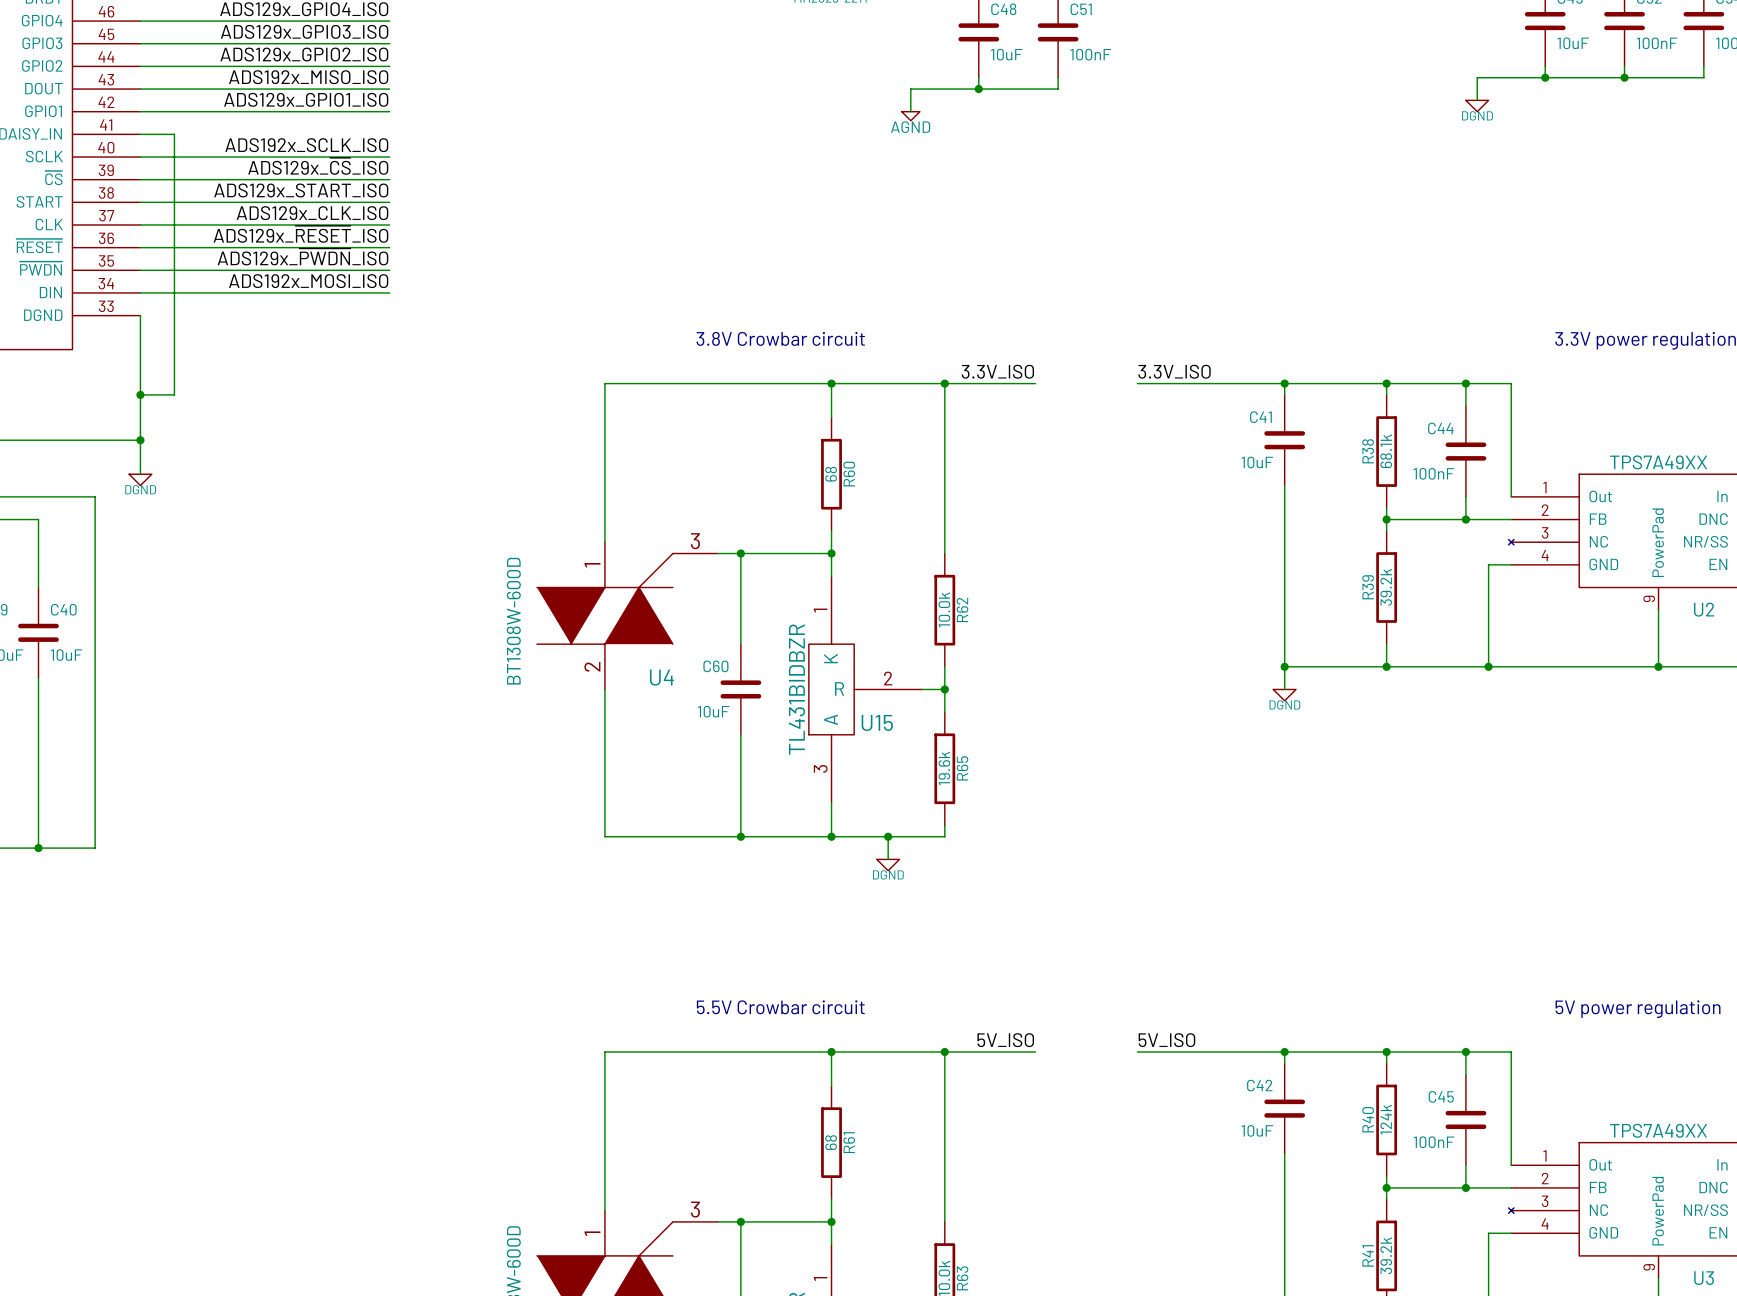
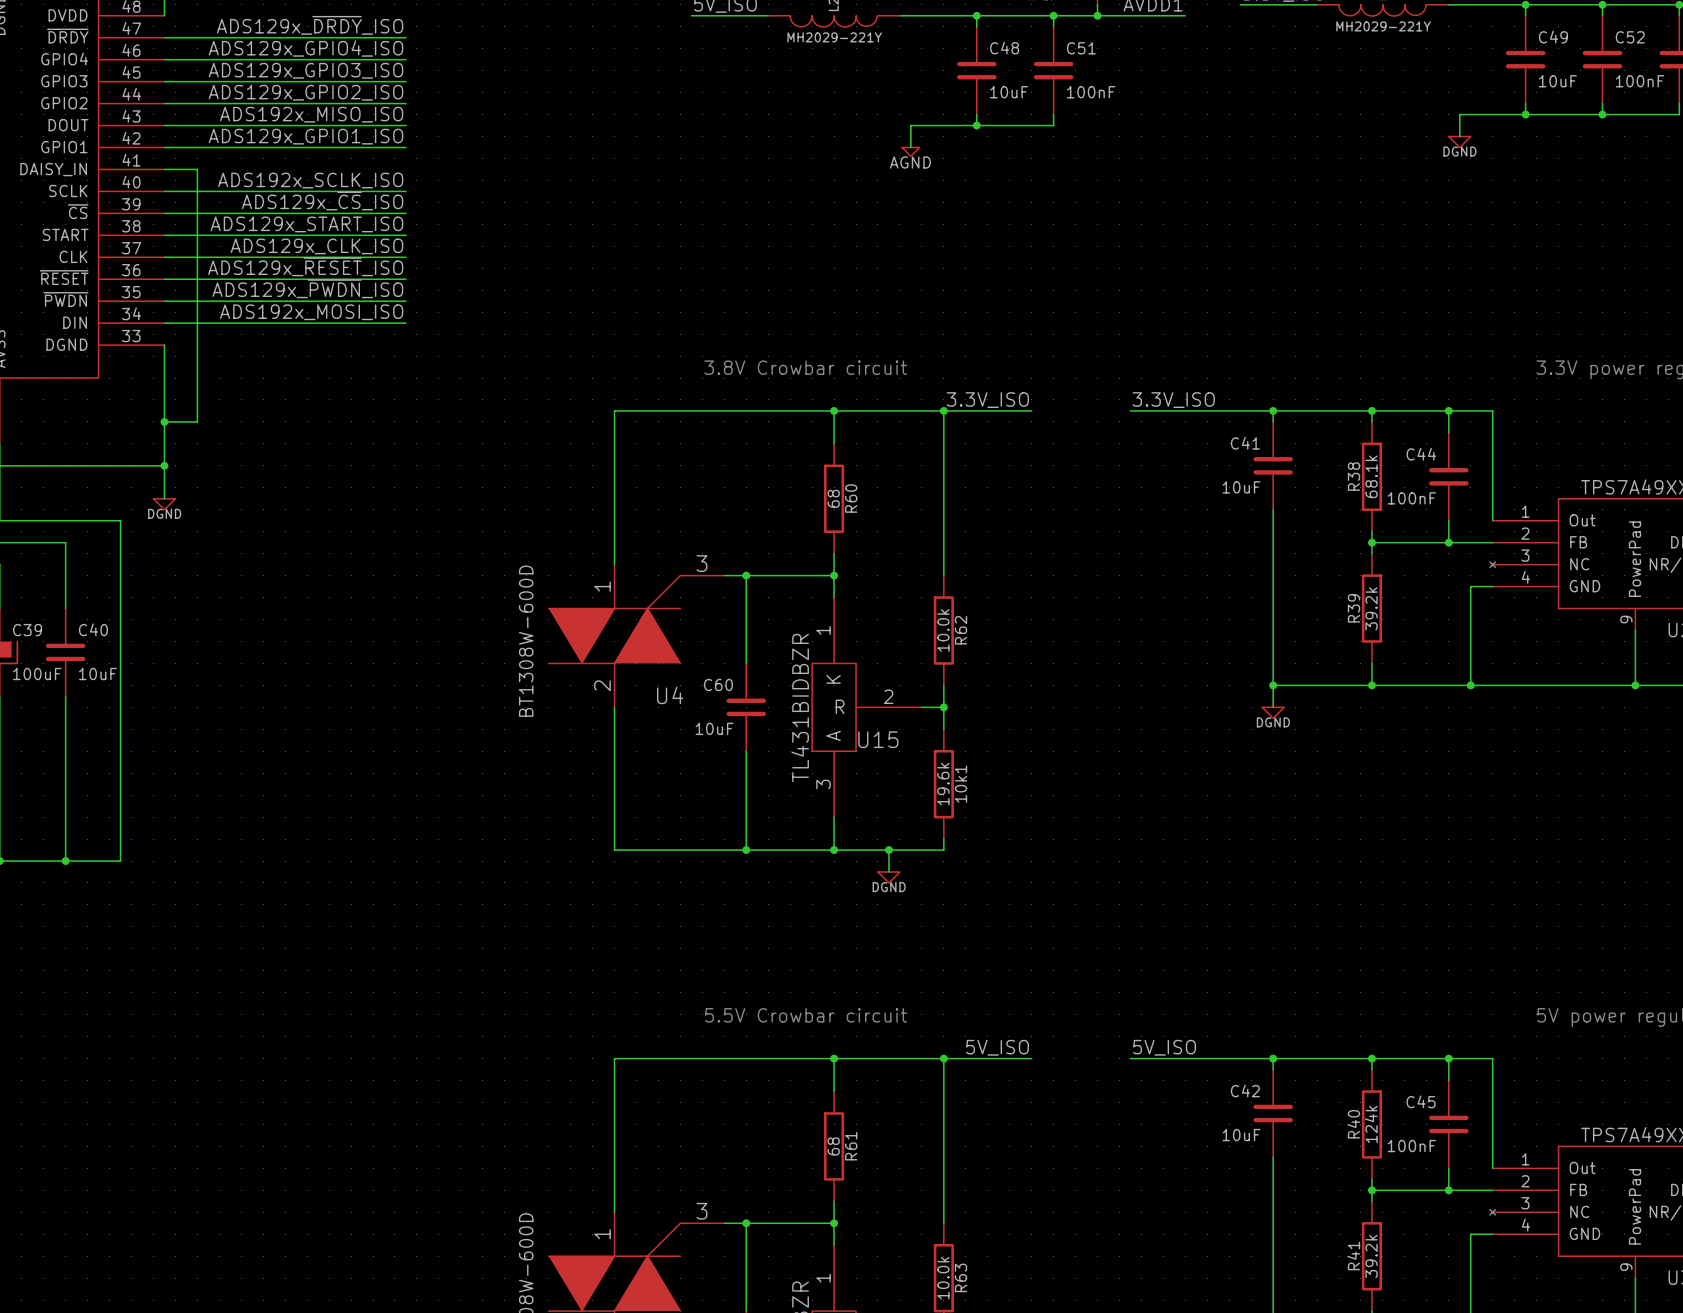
R65 name: R65 (962, 768) -> 10k1 (961, 784)

